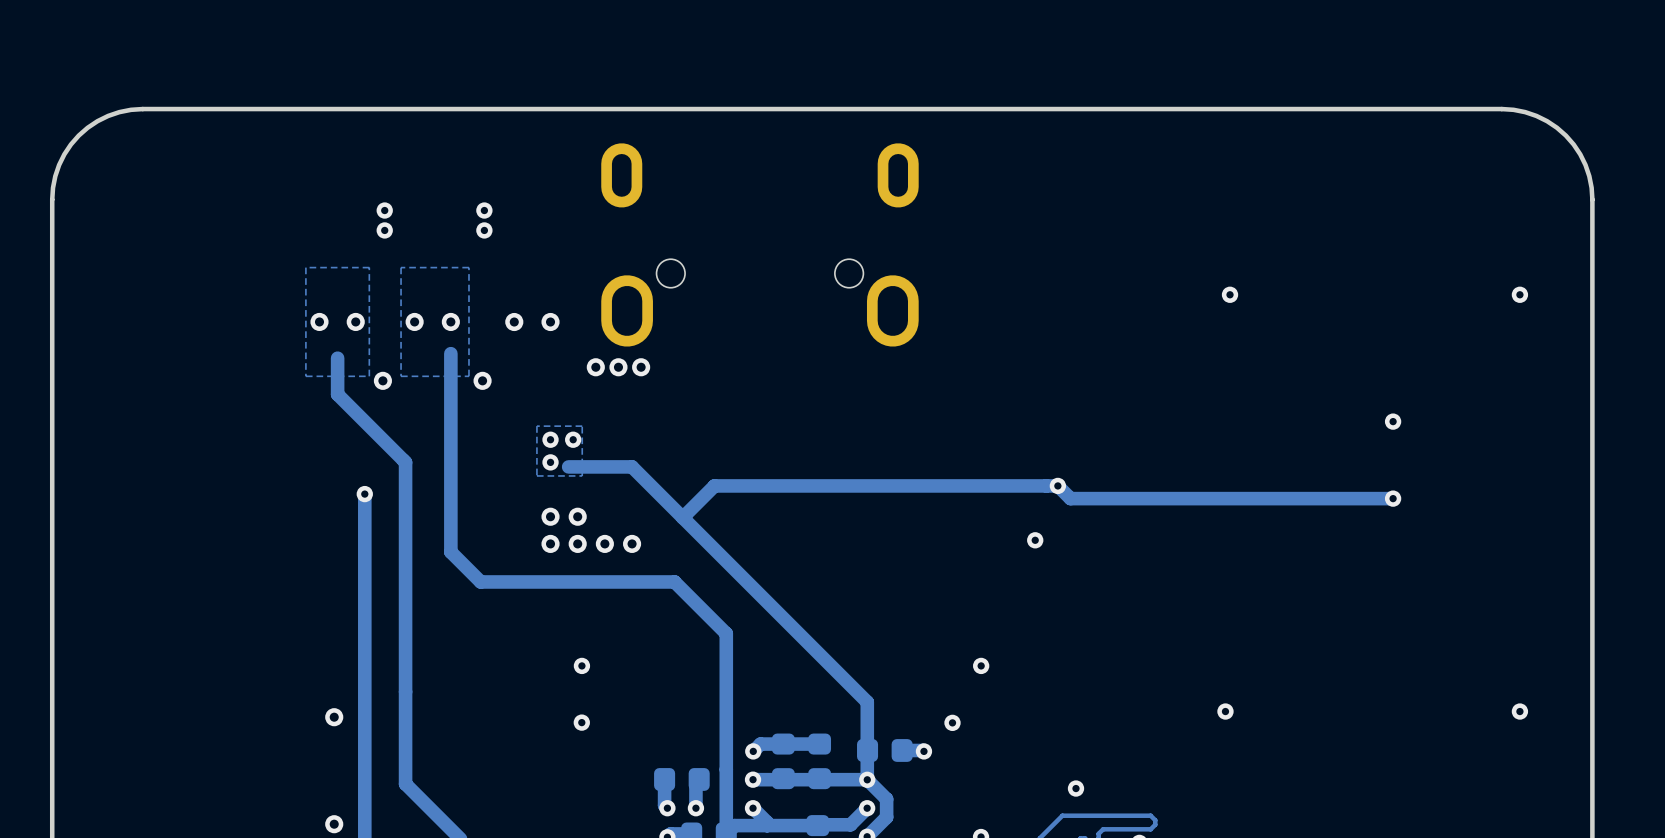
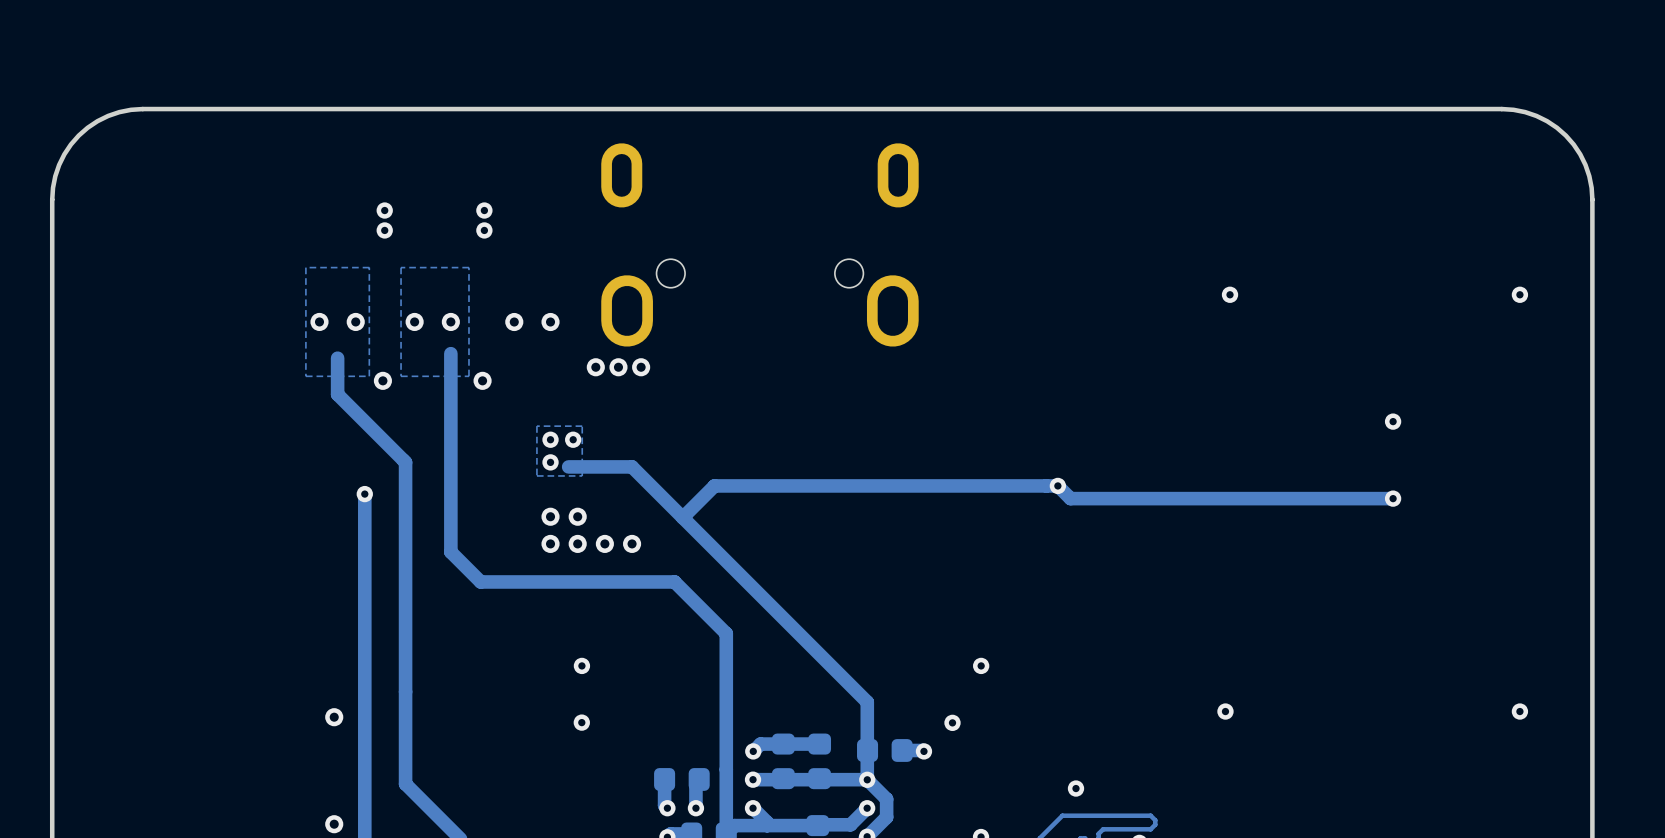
via: (1035, 540) -> none

